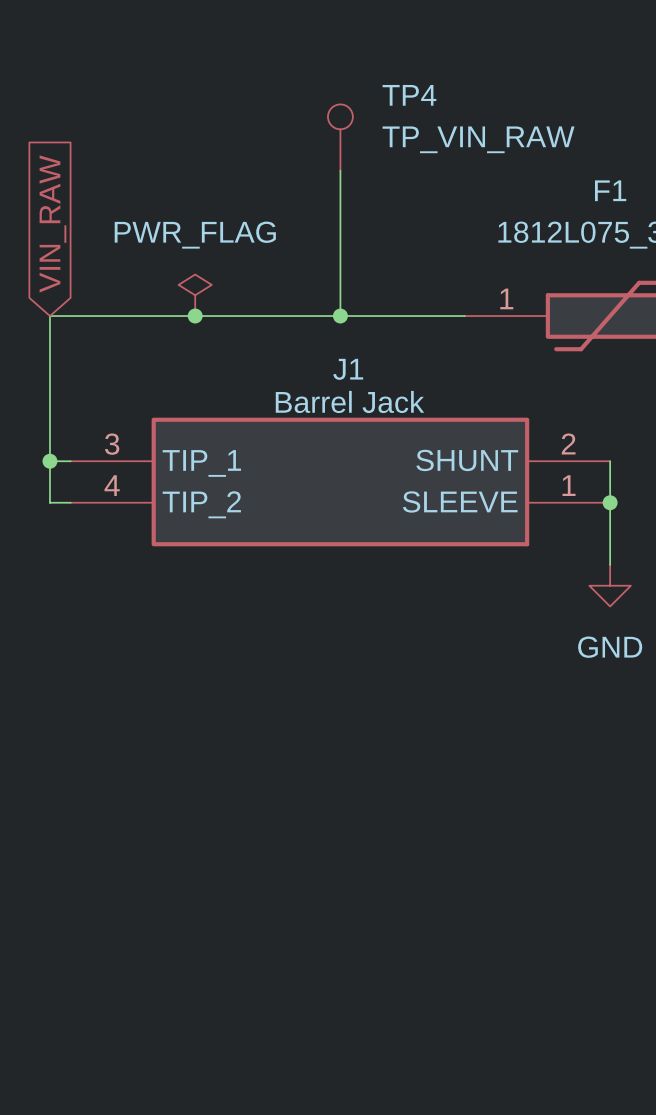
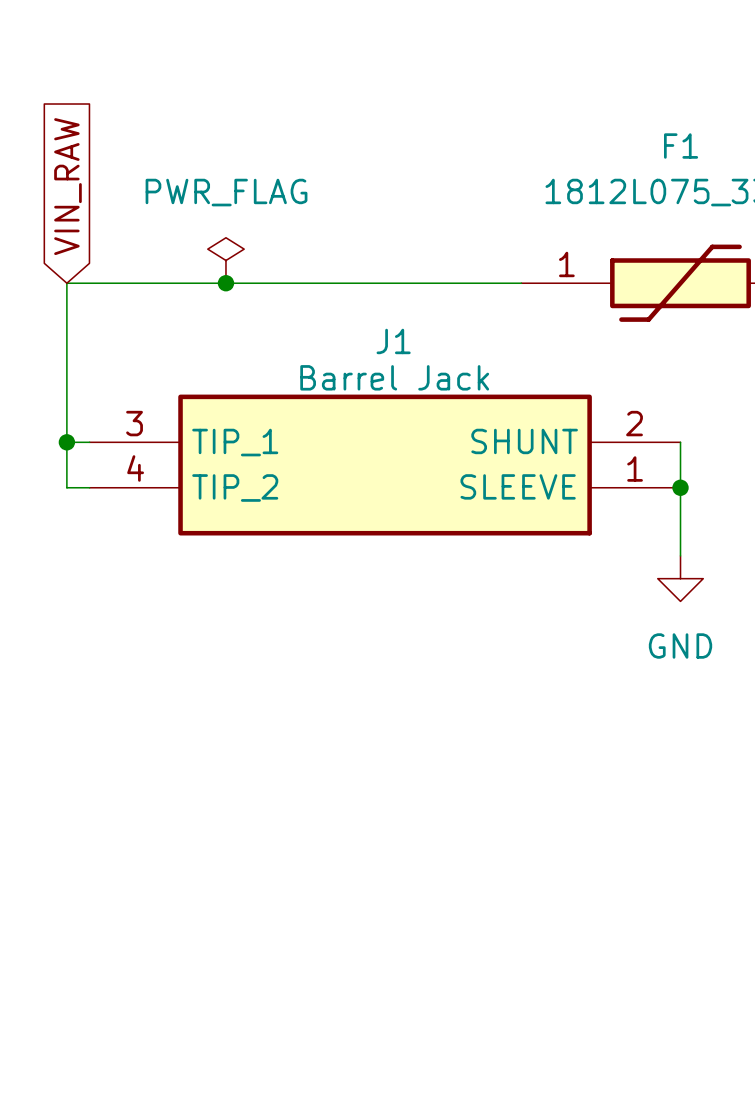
TP4: TP_VIN_RAW (340, 137) -> none
wire: (340, 170) (340, 316) -> none
junction: (340, 316) -> none

